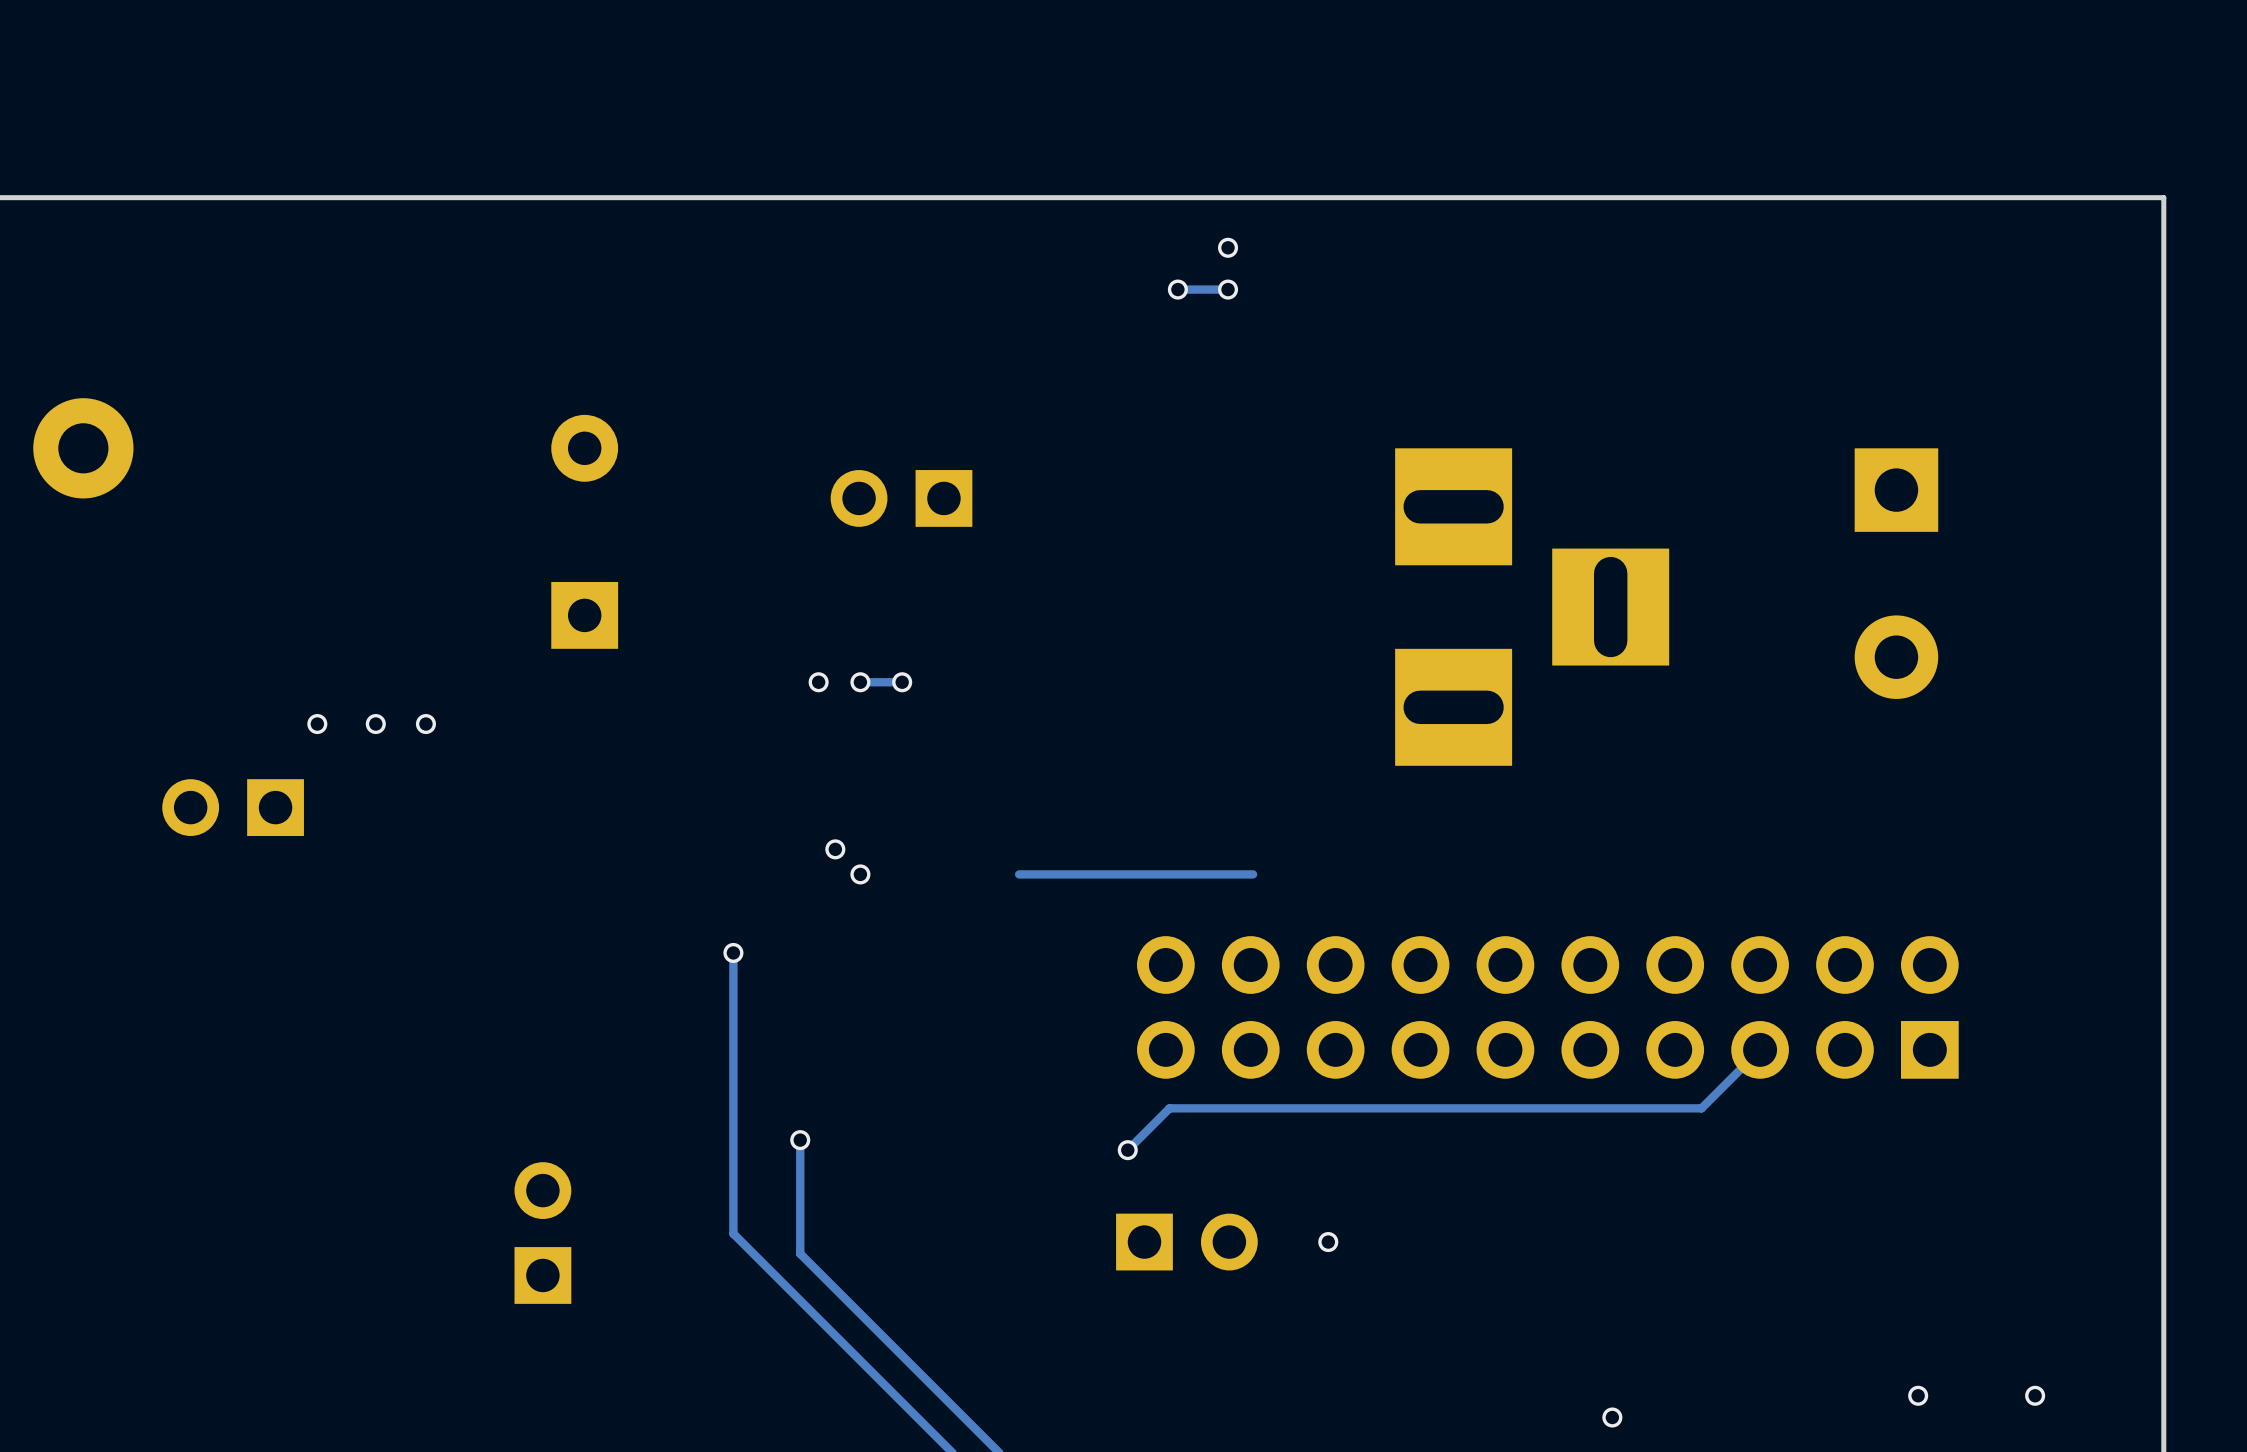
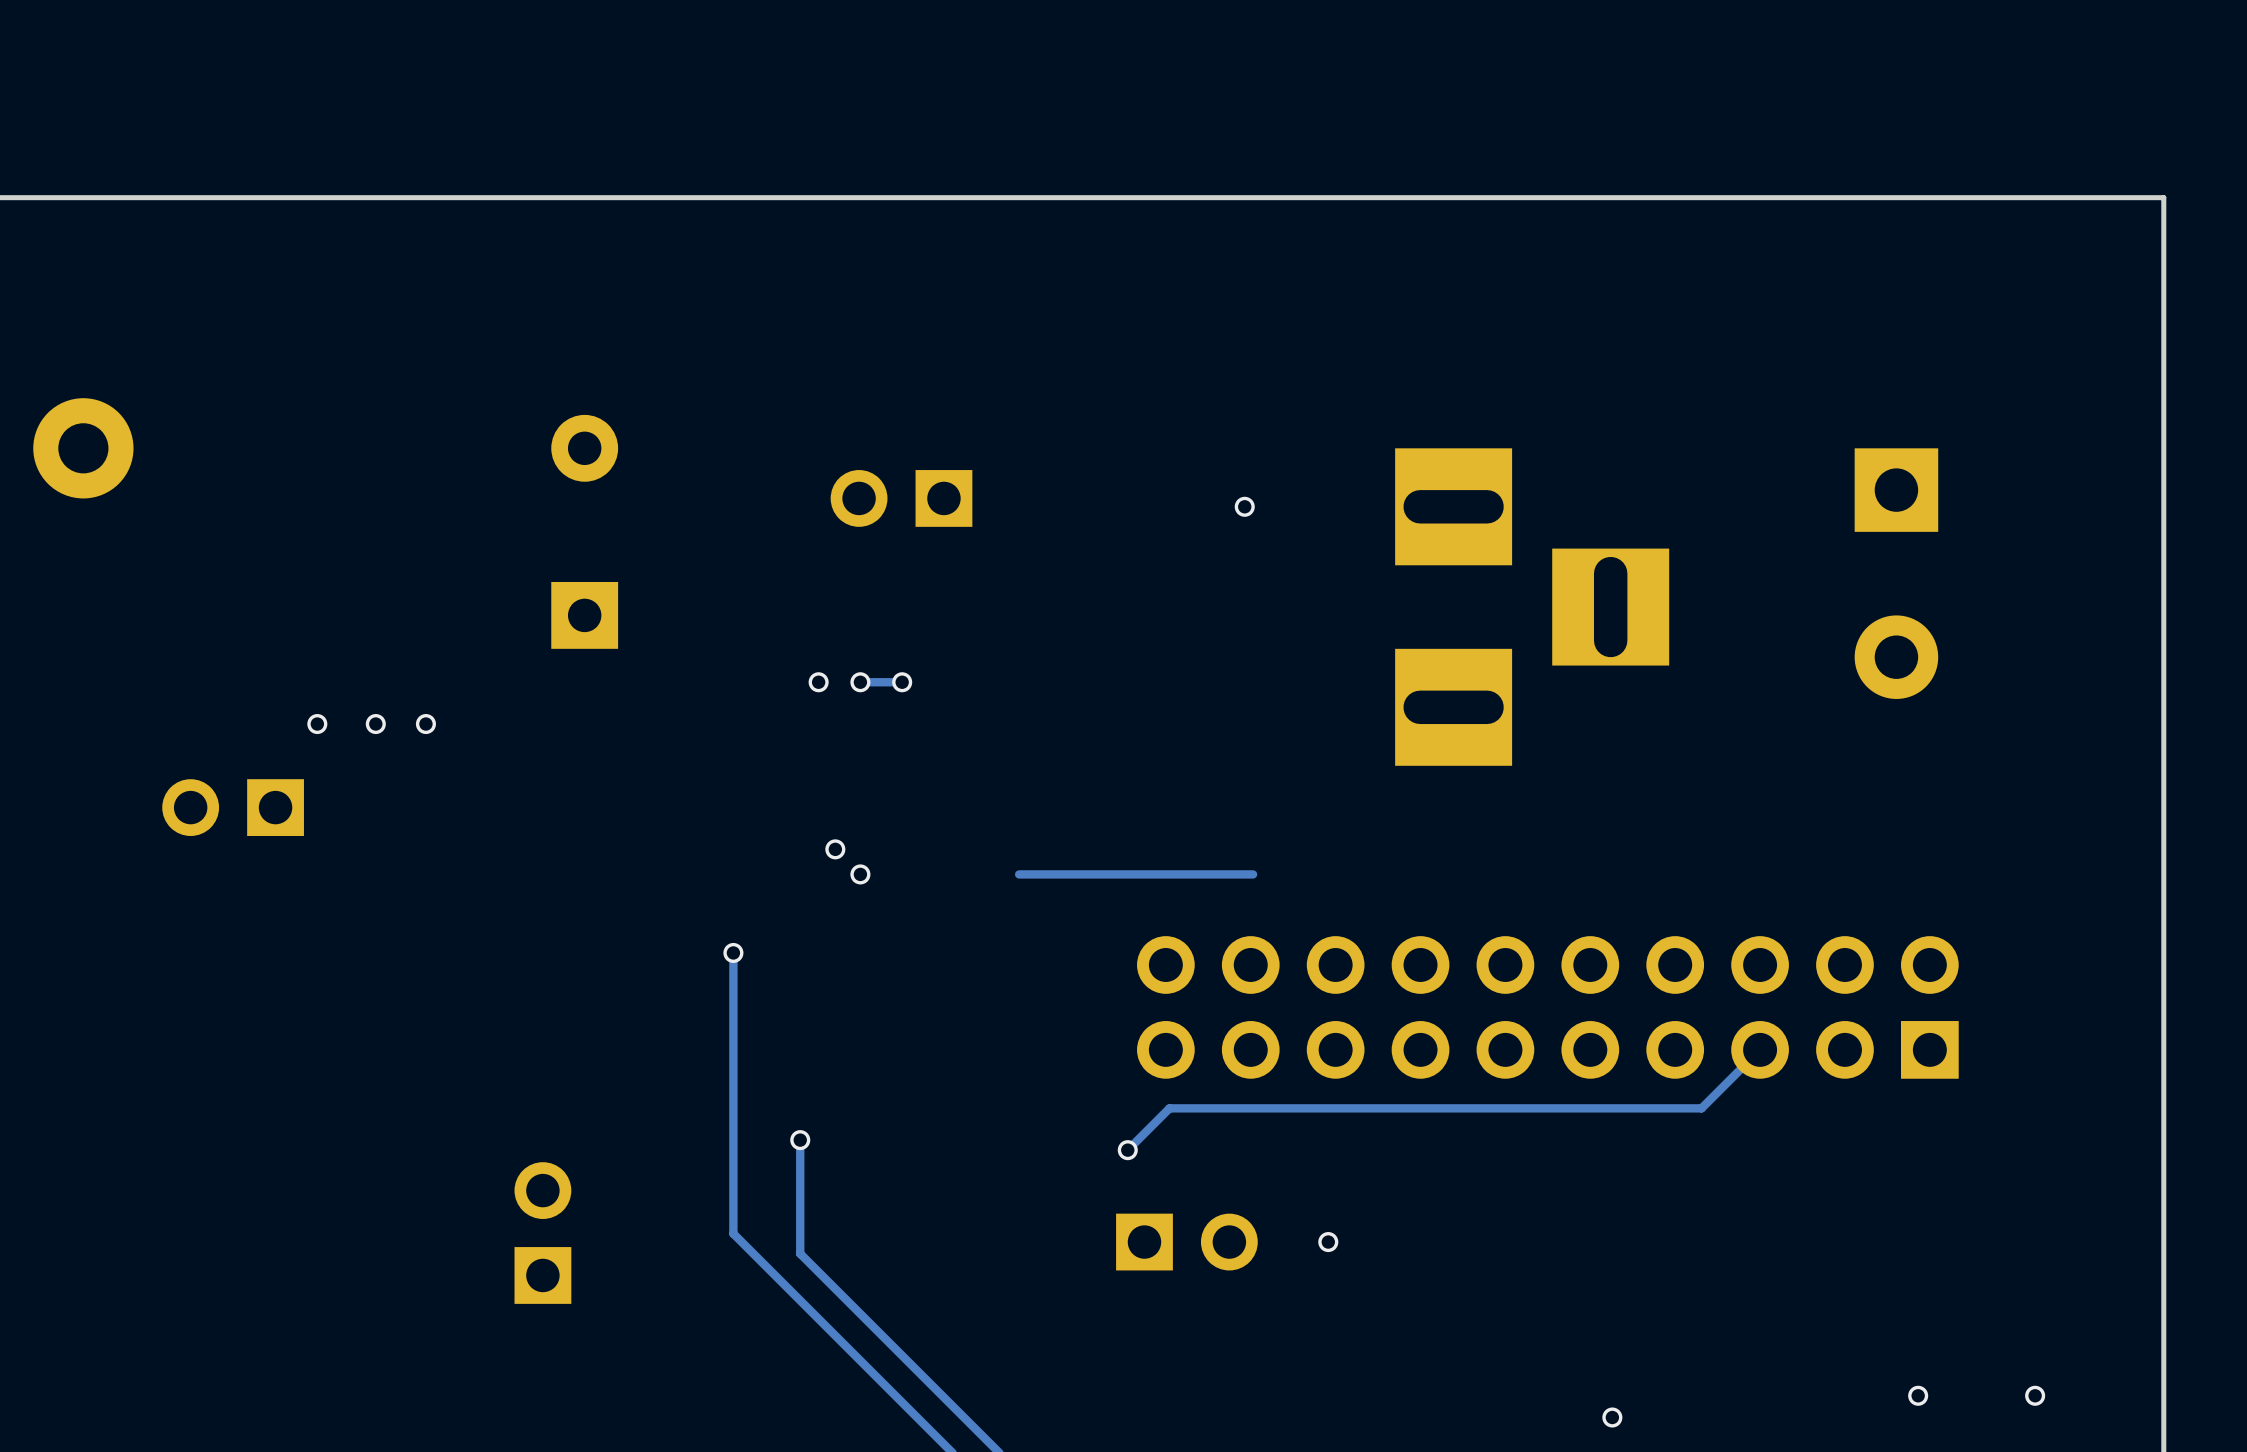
via: (1228, 247) -> none
via: (1177, 289) -> none
track: (1228, 289) (1177, 289) -> none
via: (1228, 289) -> none
via: none -> (1244, 506)

